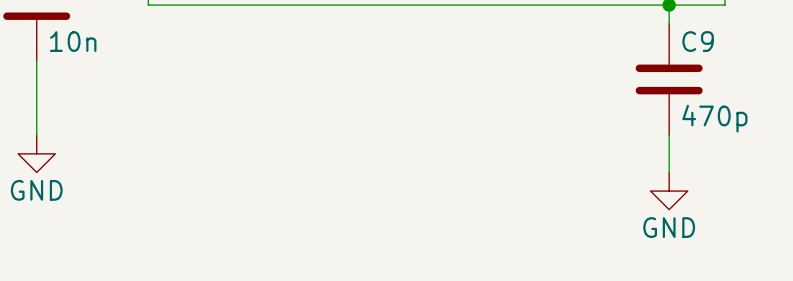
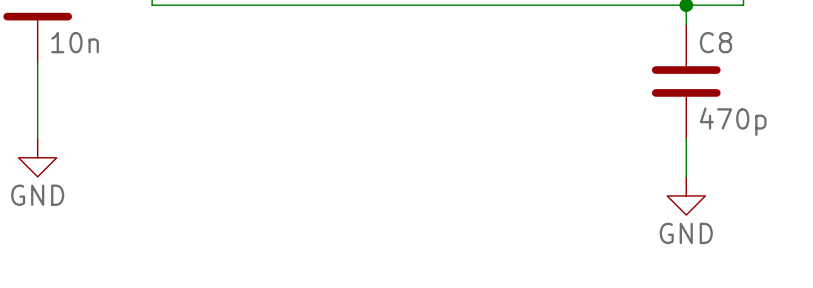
C9 name: C9 (698, 41) -> C8 (715, 42)

